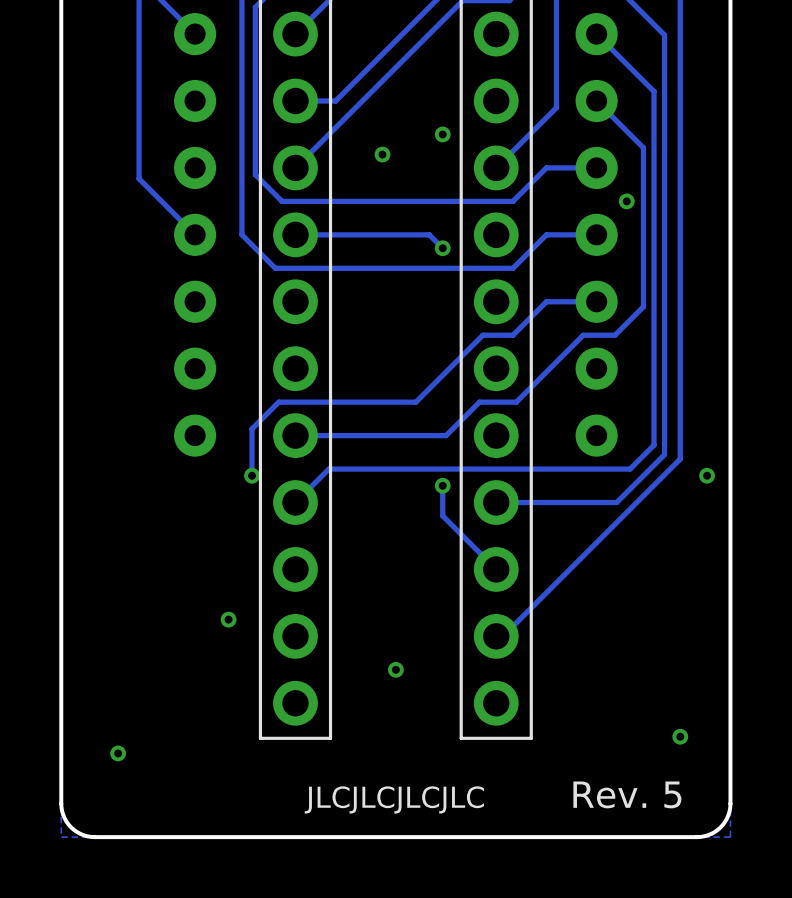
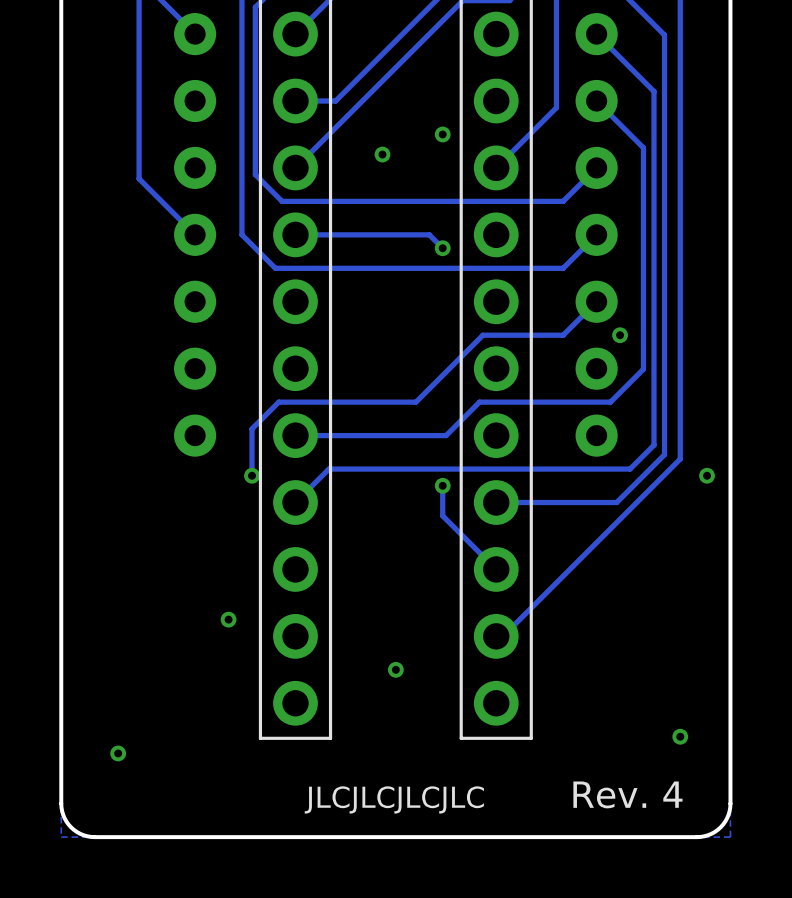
track: (596, 167) (546, 167) (512, 201) -> (596, 167) (563, 201) (512, 201)
via position: (626, 201) -> (620, 335)
track: (596, 234) (546, 234) (512, 268) -> (596, 234) (563, 268) (512, 268)
track: (596, 301) (546, 301) (512, 335) -> (596, 301) (563, 335) (512, 335)
track: (643, 306) (615, 335) (583, 335) (516, 402) -> (643, 306) (643, 369) (610, 402) (516, 402)
text: Rev. 5 (627, 794) -> Rev. 4 (627, 794)

